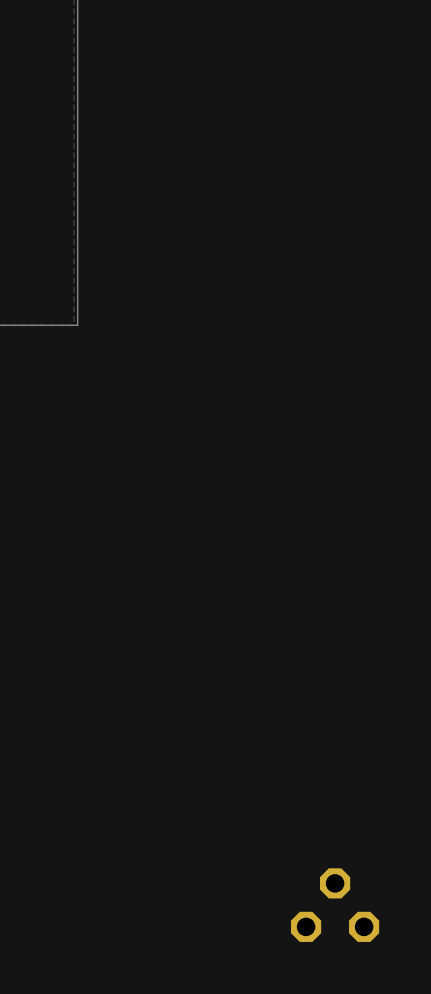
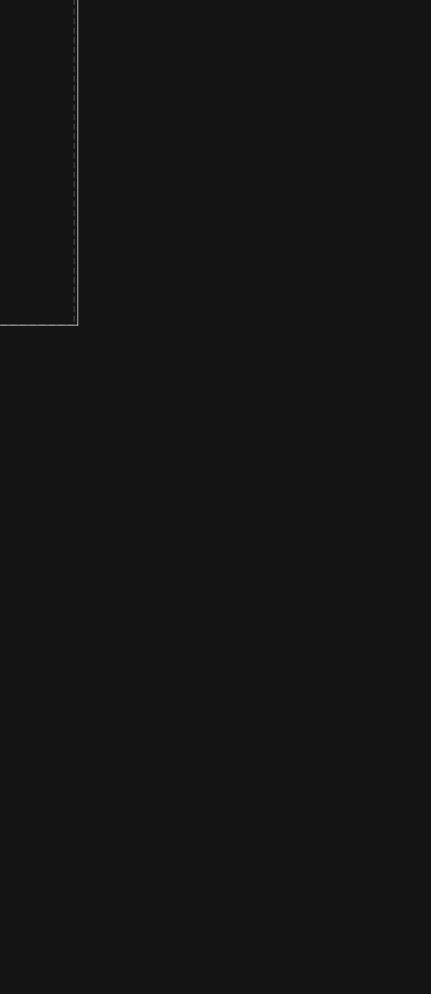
part: (335, 905) -> none

